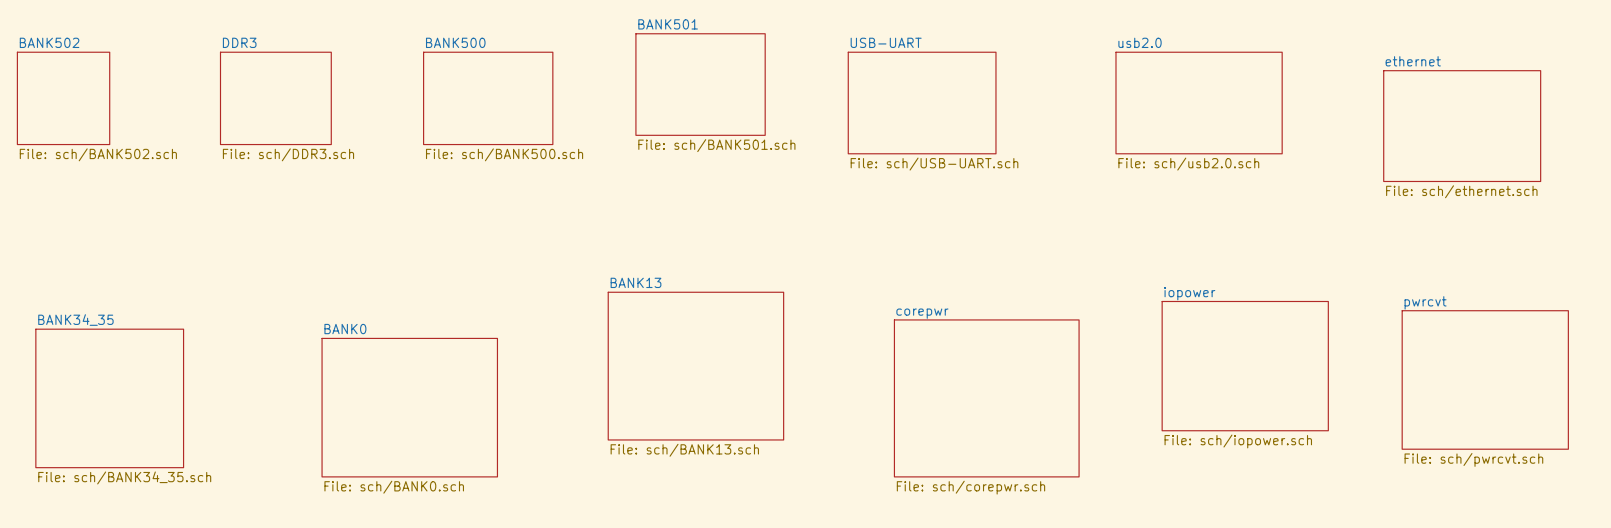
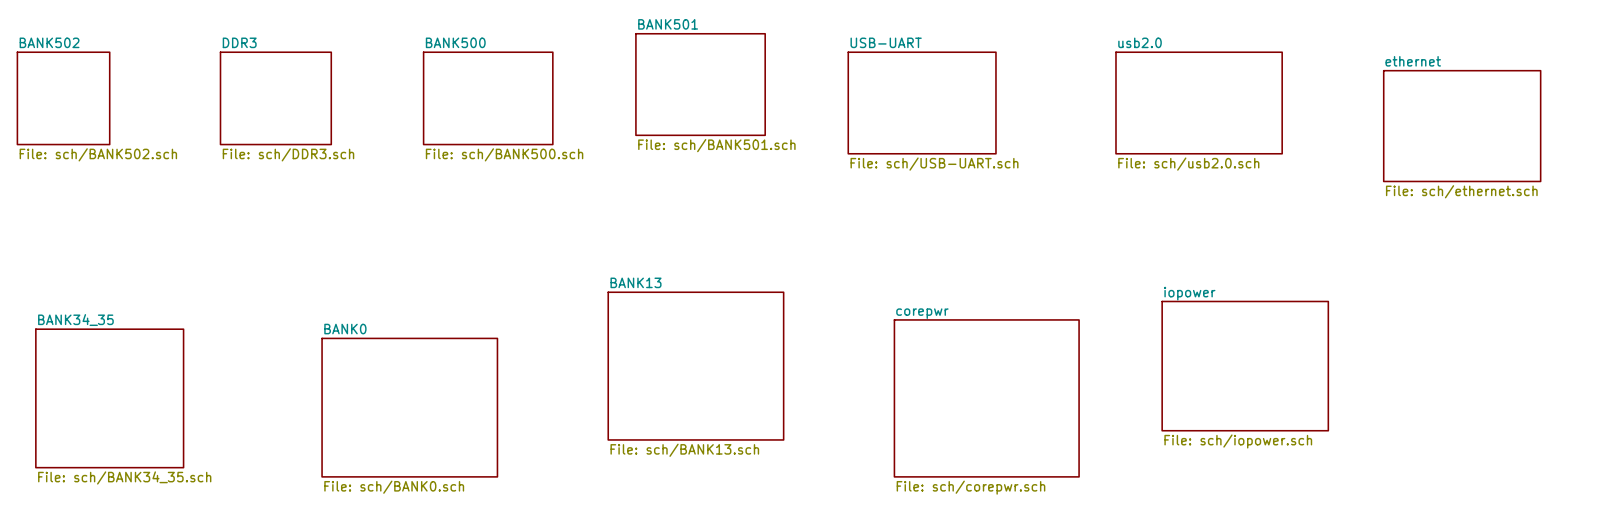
sheet pwrcvt: File: sch/pwrcvt.sch (1485, 379) -> none

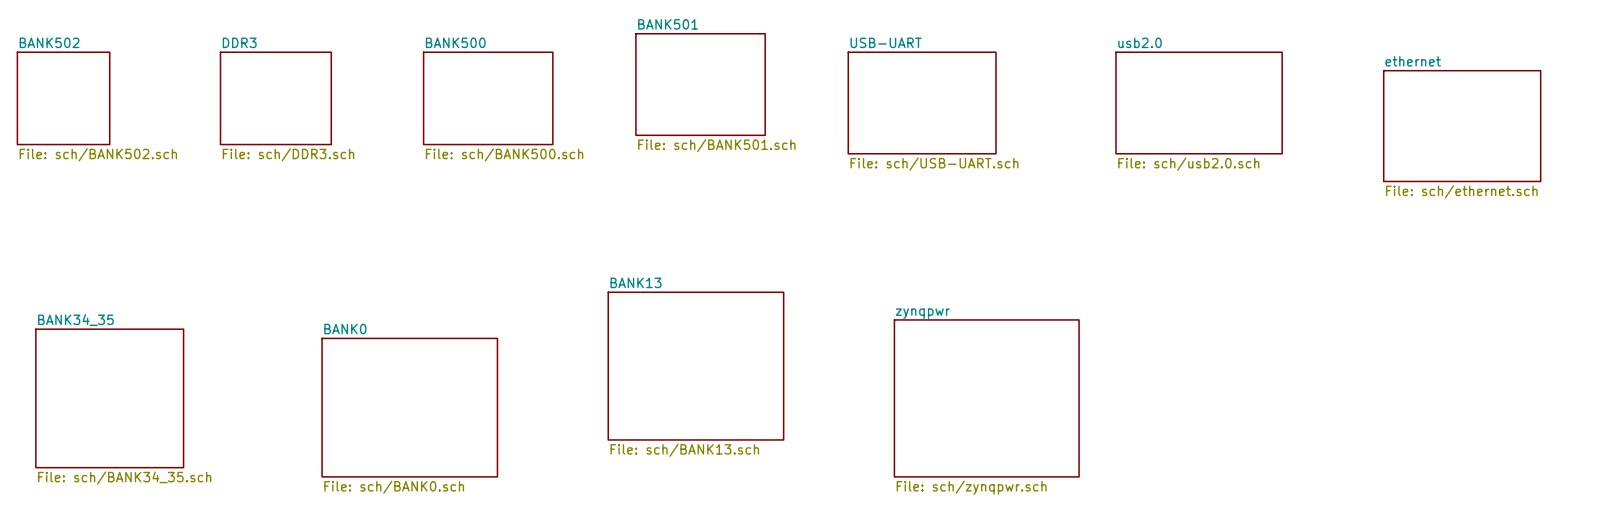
sheet corepwr name: corepwr (922, 313) -> zynqpwr (922, 313)
sheet iopower: File: sch/iopower.sch (1245, 366) -> none
sheet corepwr value: File: sch/corepwr.sch (970, 487) -> File: sch/zynqpwr.sch (971, 487)

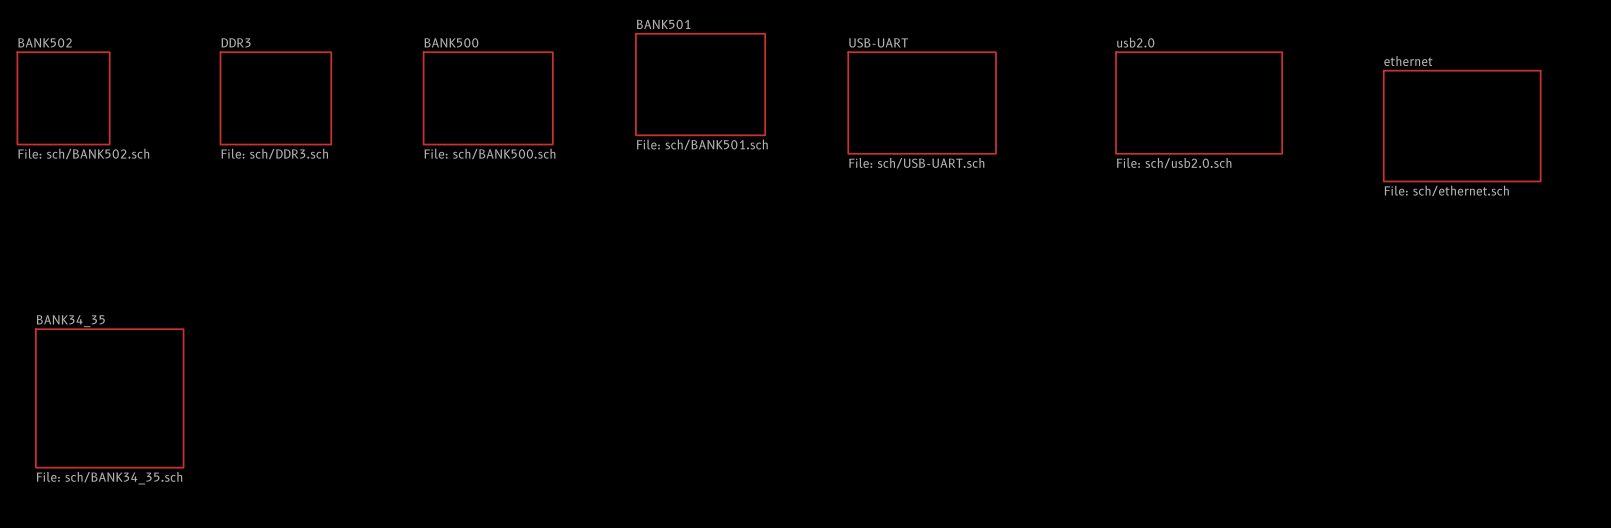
sheet BANK13: File: sch/BANK13.sch (695, 366) -> none
sheet zynqpwr: File: sch/zynqpwr.sch (986, 398) -> none
sheet BANK0: File: sch/BANK0.sch (409, 407) -> none

